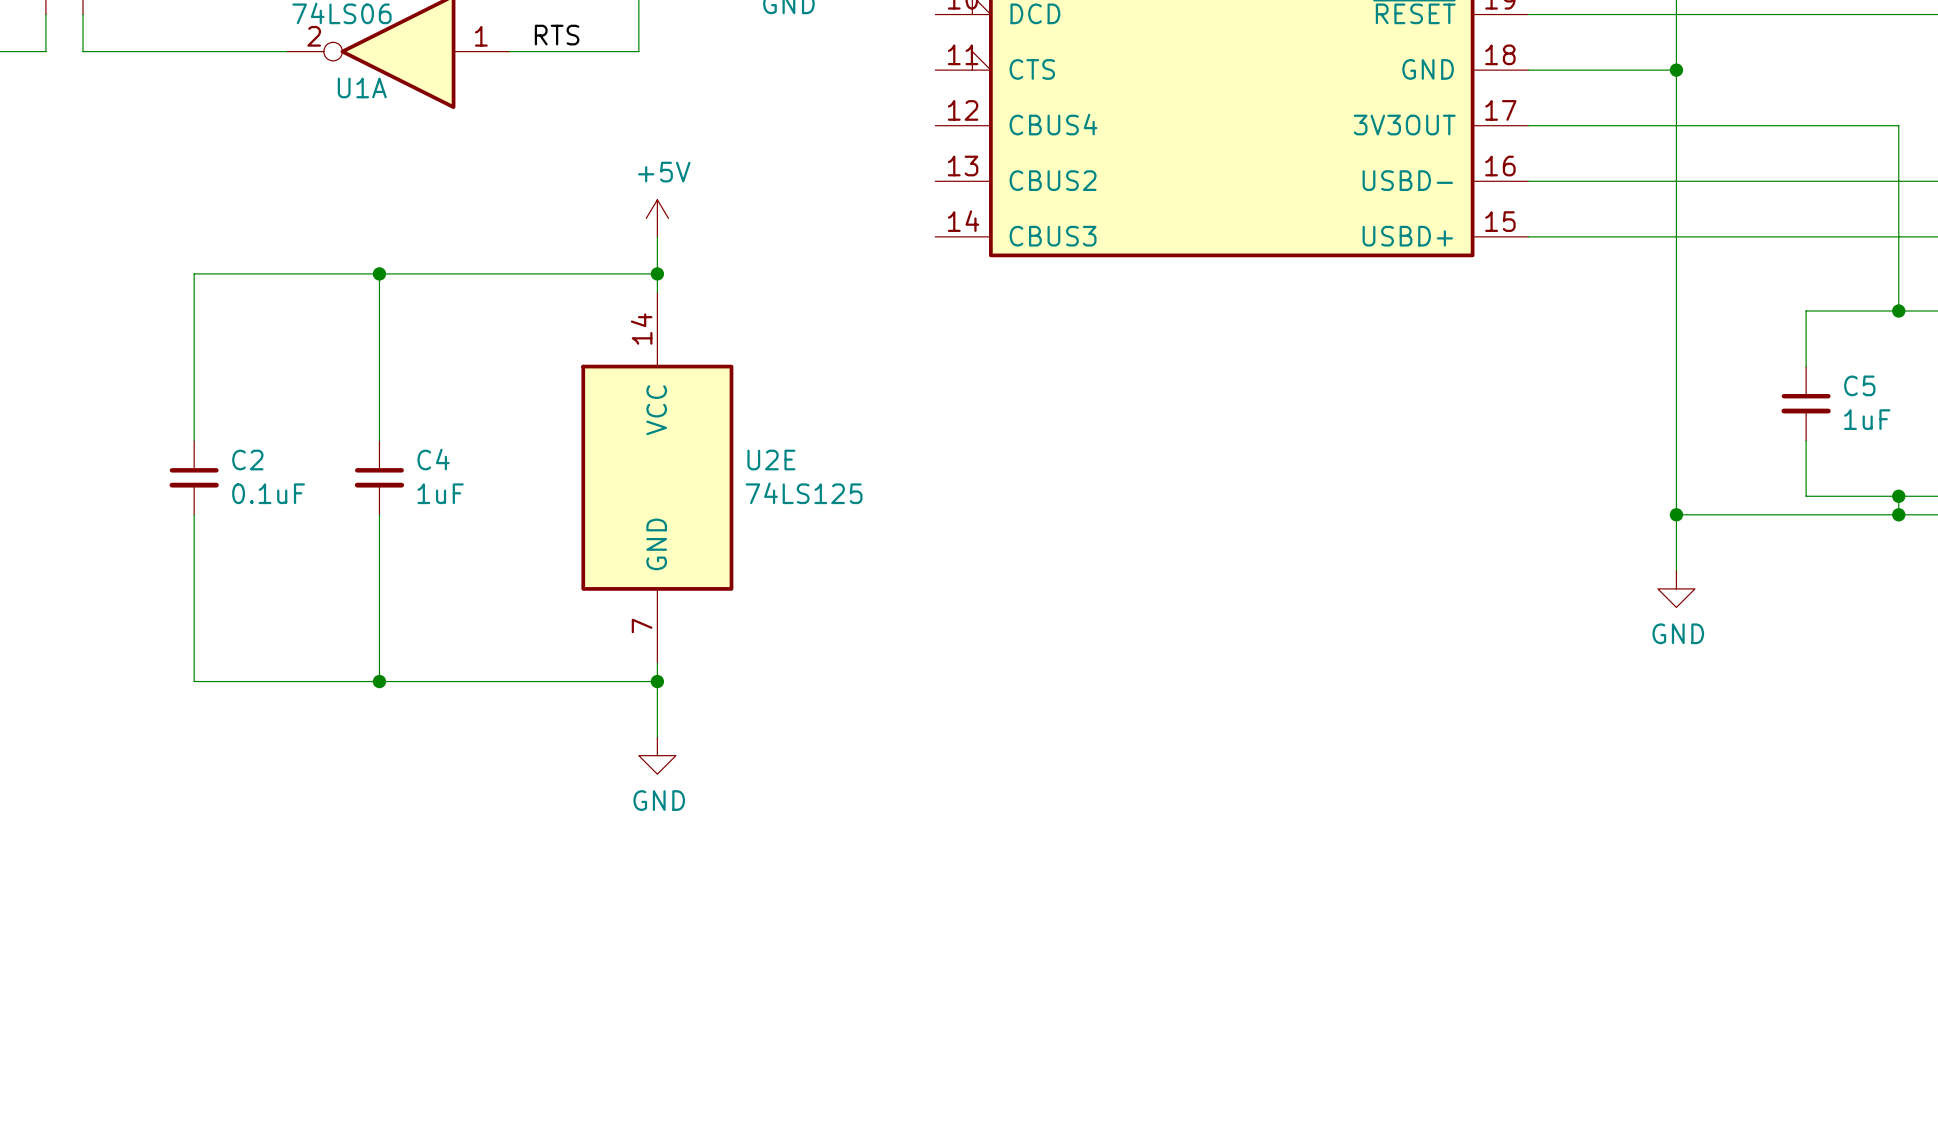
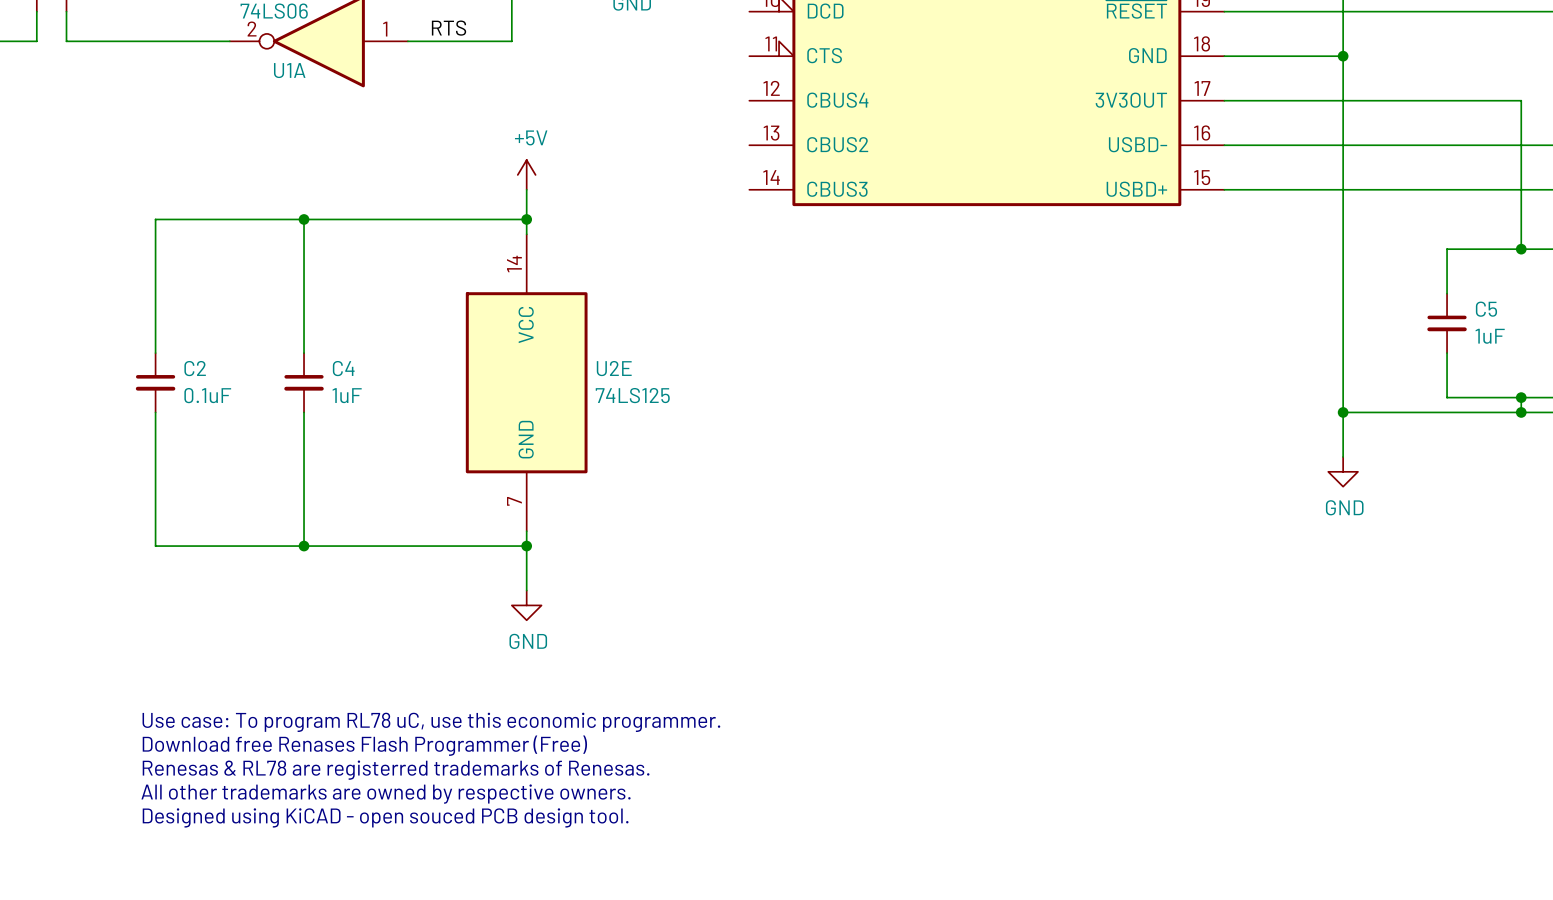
text: none -> Use case: To program RL78 uC, use this economic programmer. (431, 722)
text: none -> Download free Renases Flash Programmer (Free) (364, 745)
text: none -> Renesas & RL78 are registerred trademarks of Renesas. (396, 770)
text: none -> All other trademarks are owned by respective owners. (386, 794)
text: none -> Designed using KiCAD - open souced PCB design tool. (385, 817)

